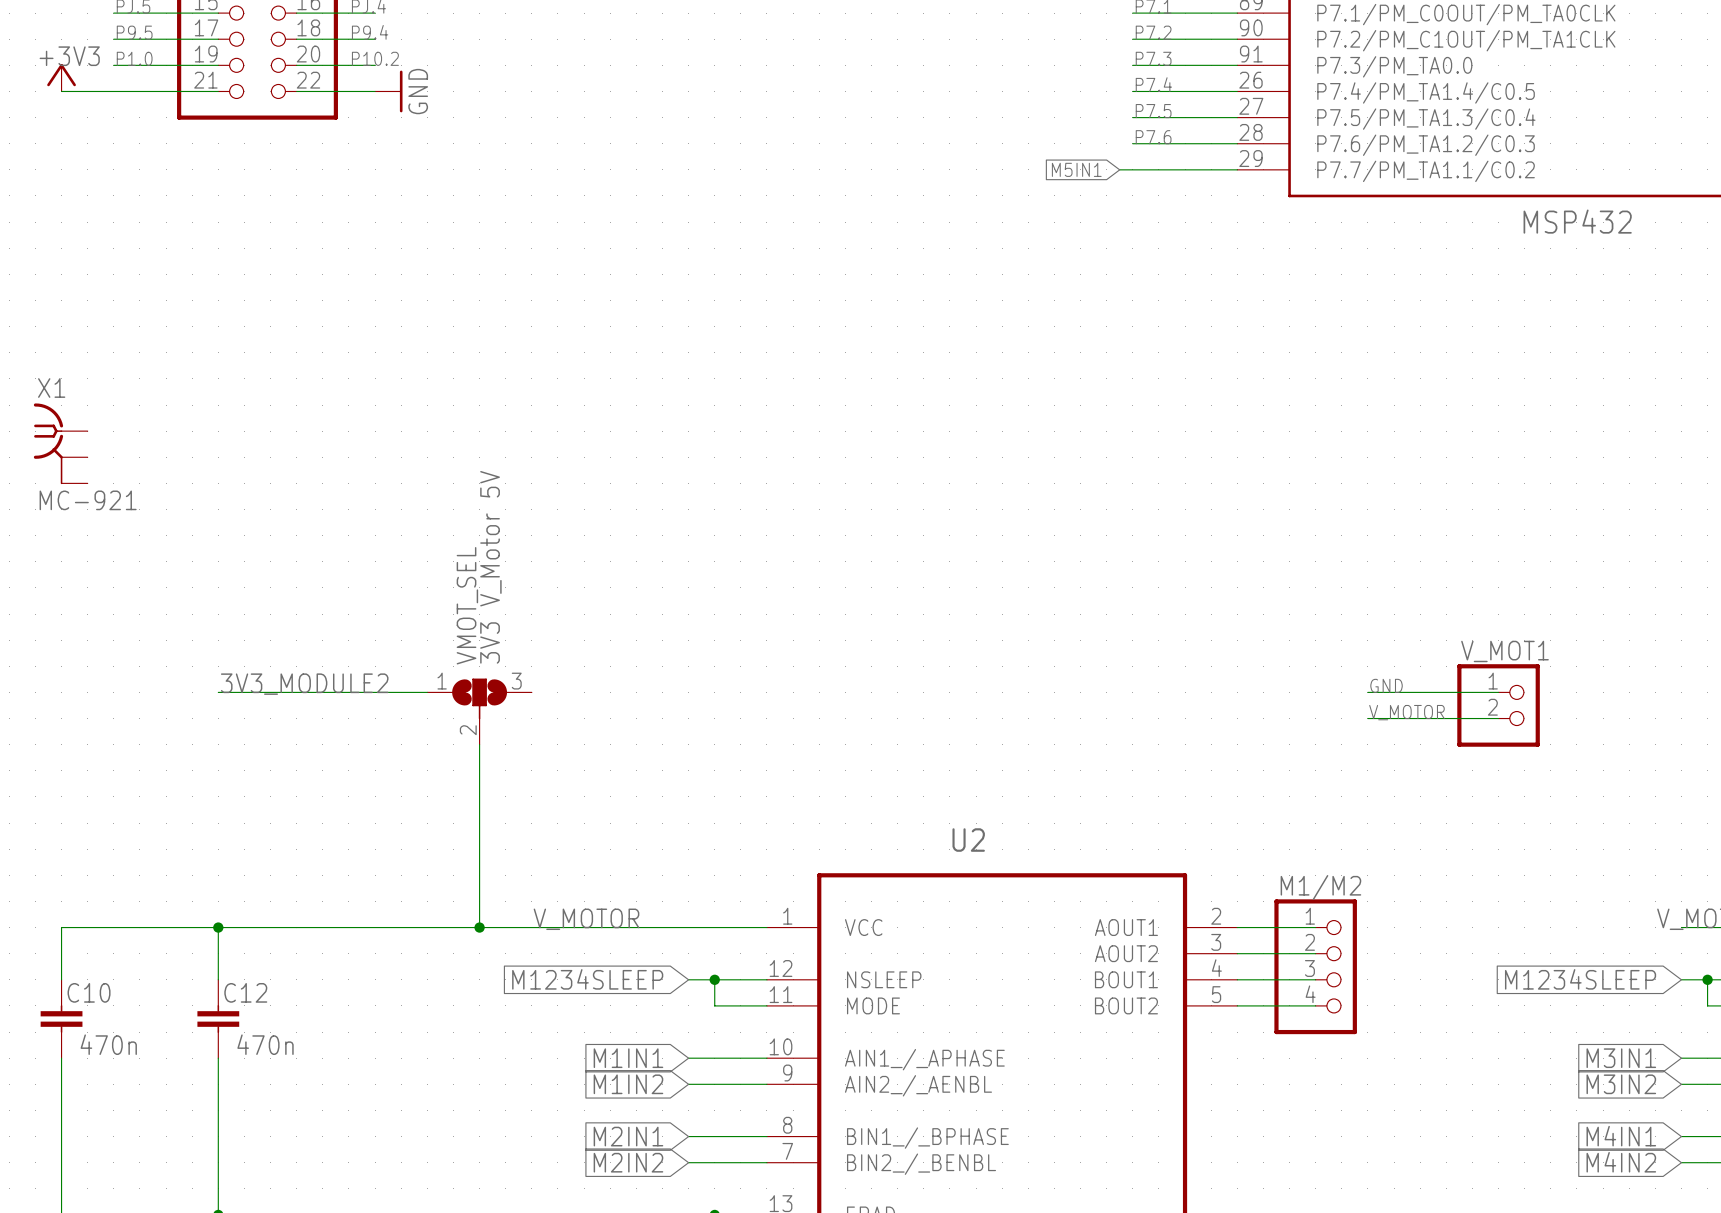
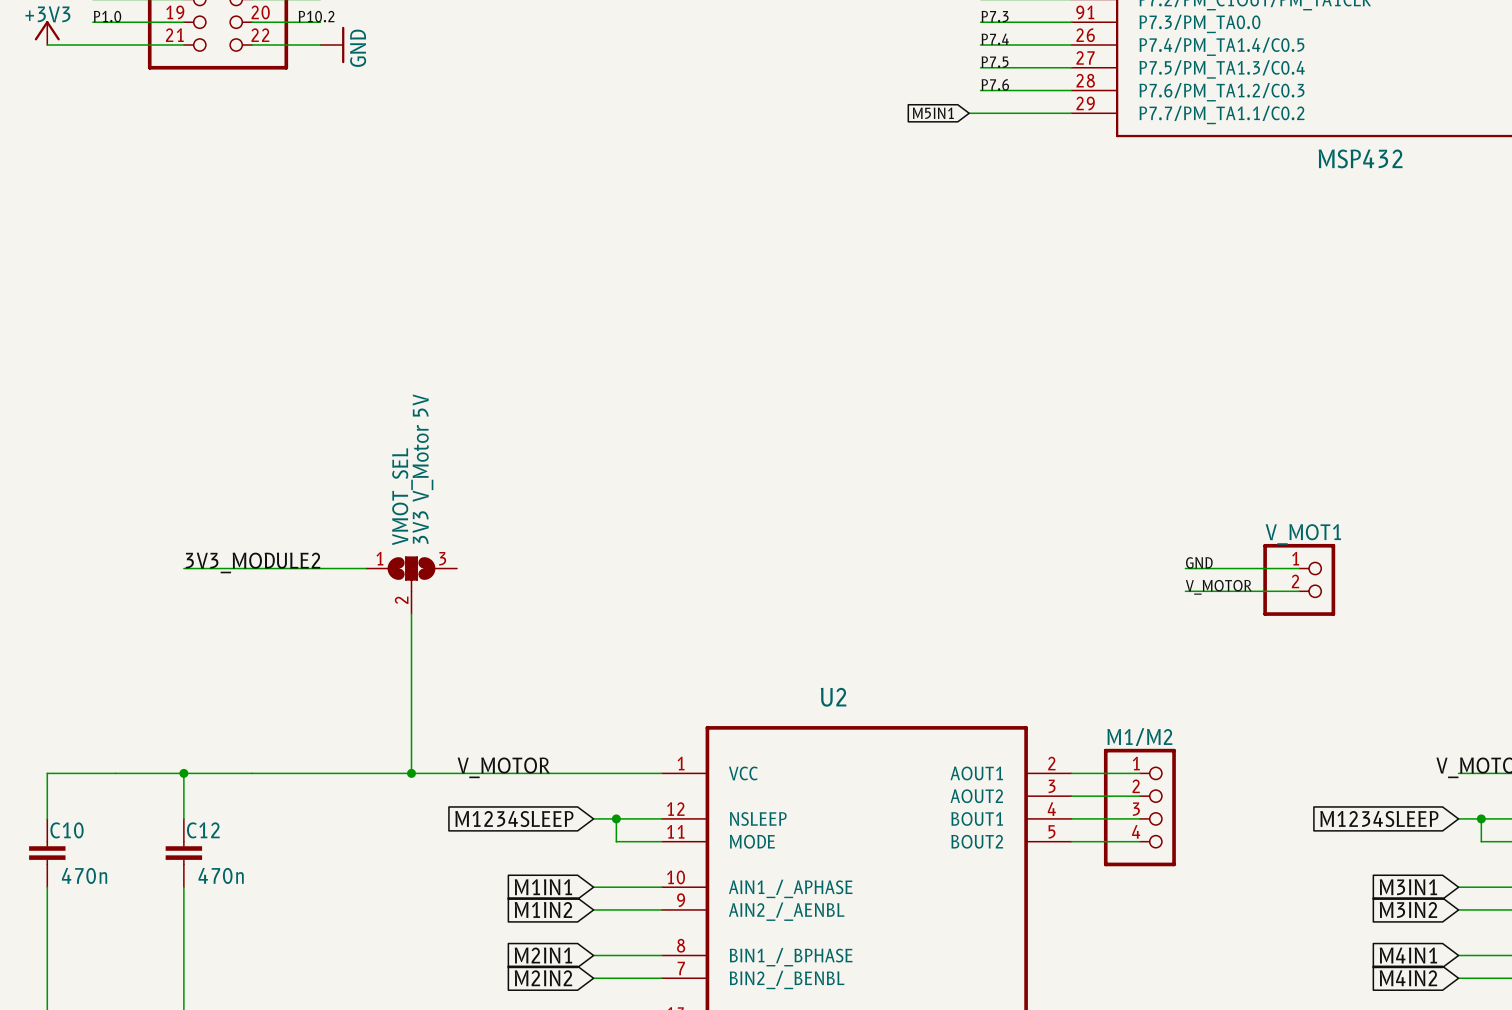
X1: MC-921 (60, 443) -> none

